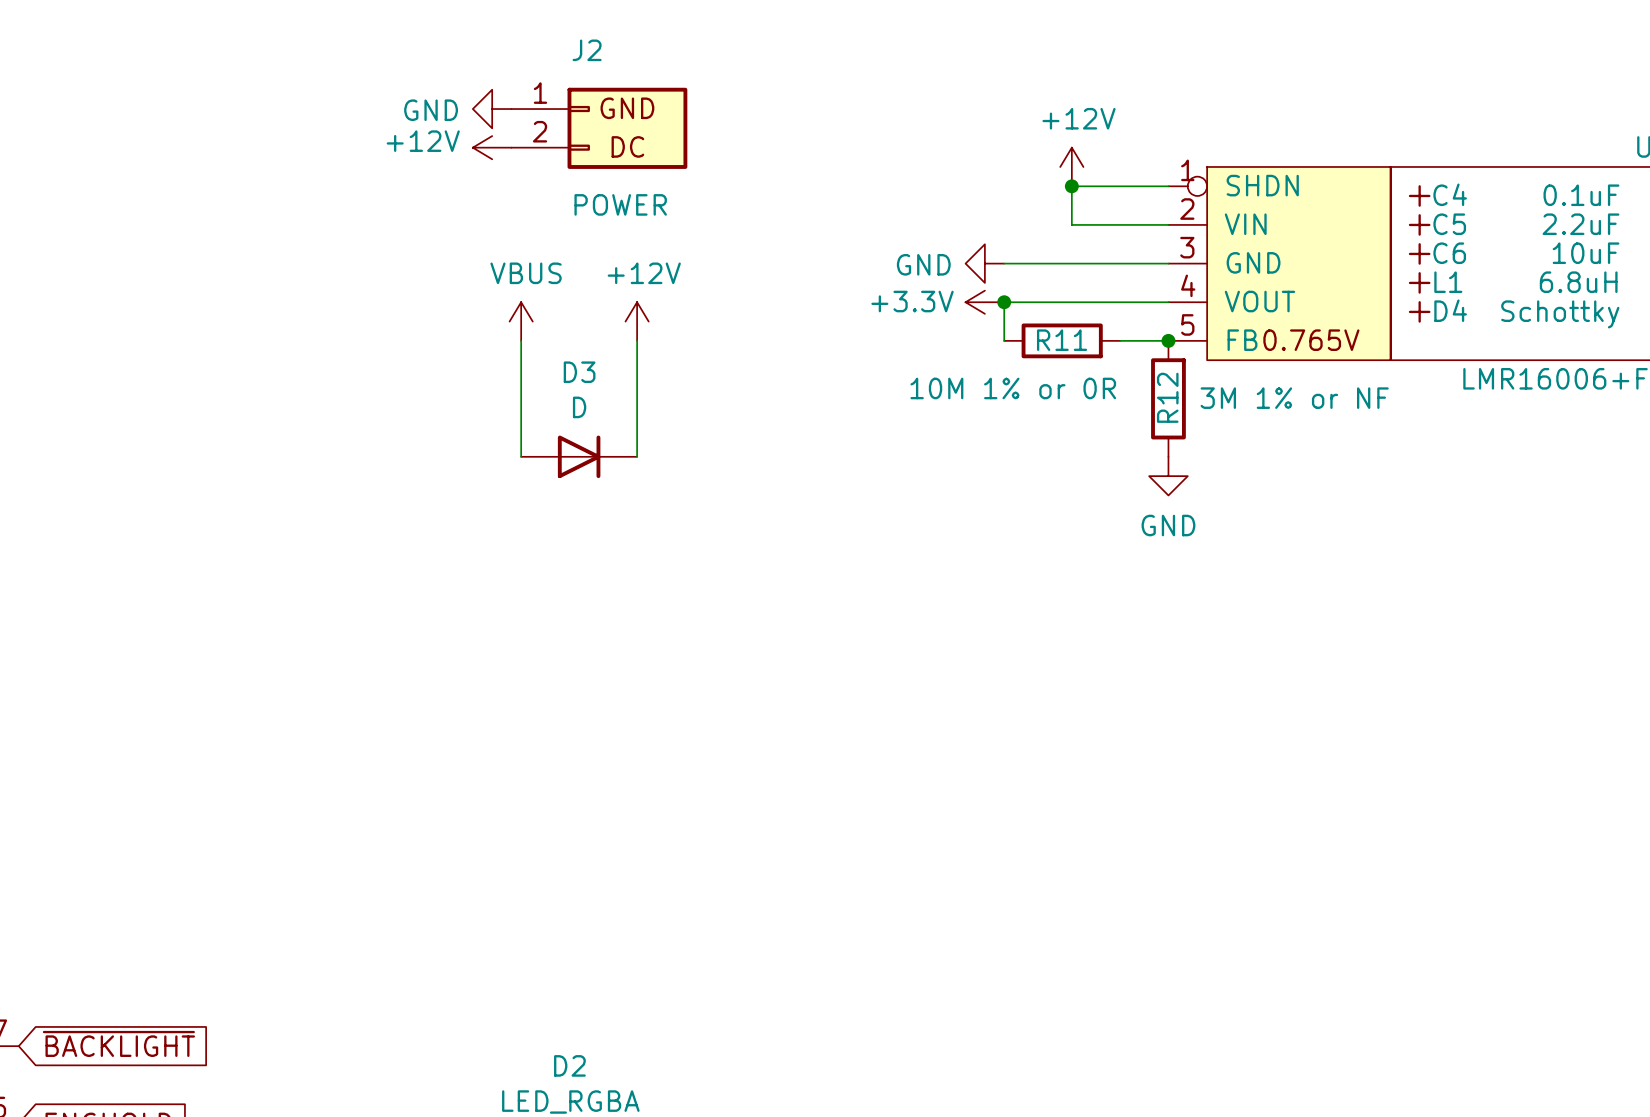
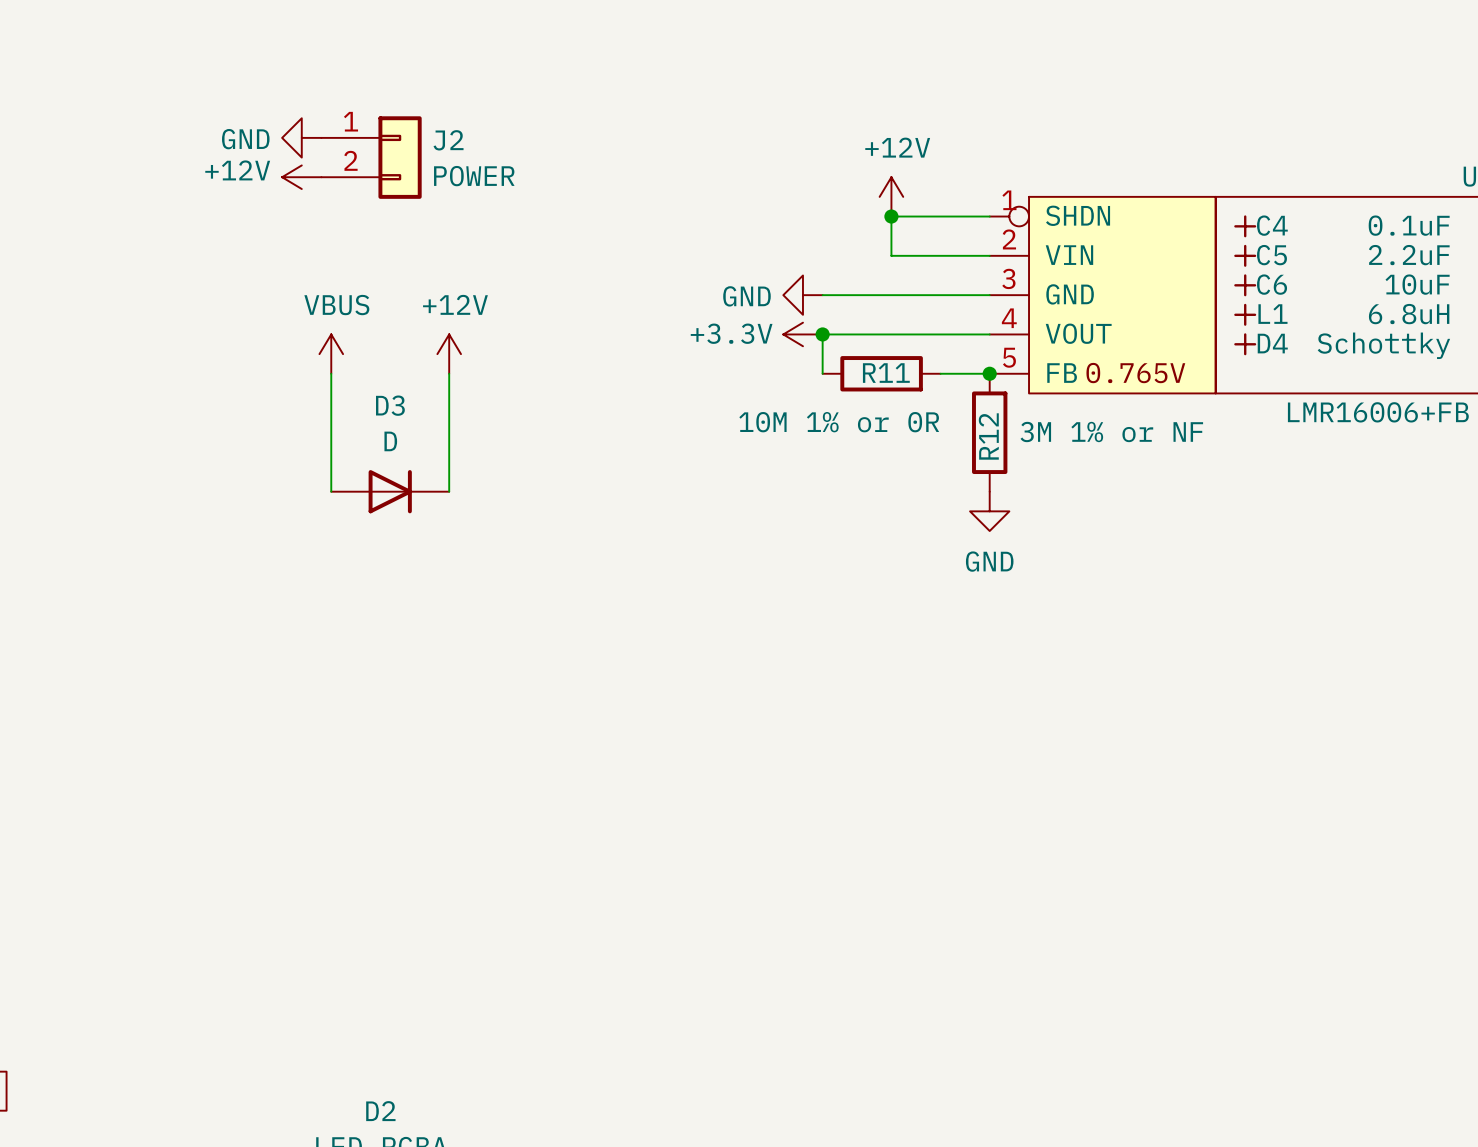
J2 name position: J2 (587, 50) -> J2 (448, 140)
J2 symbol: [511, 87, 688, 169] -> [321, 116, 422, 199]
J2 value position: POWER (620, 204) -> POWER (474, 176)

